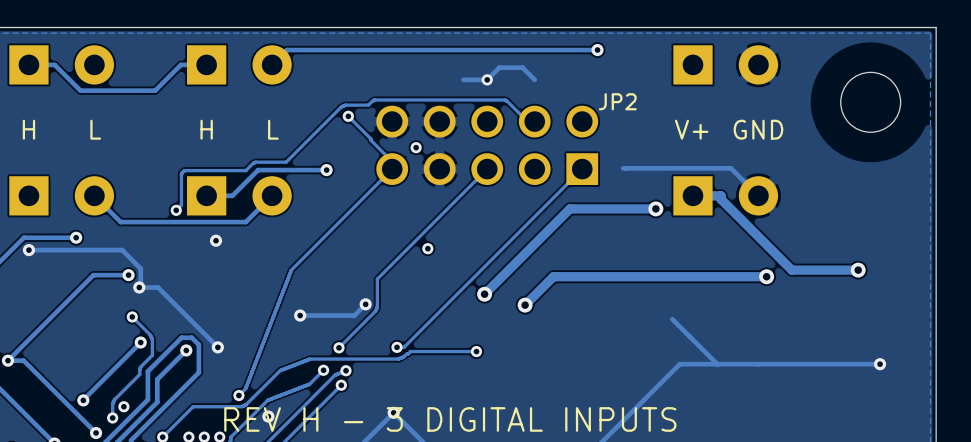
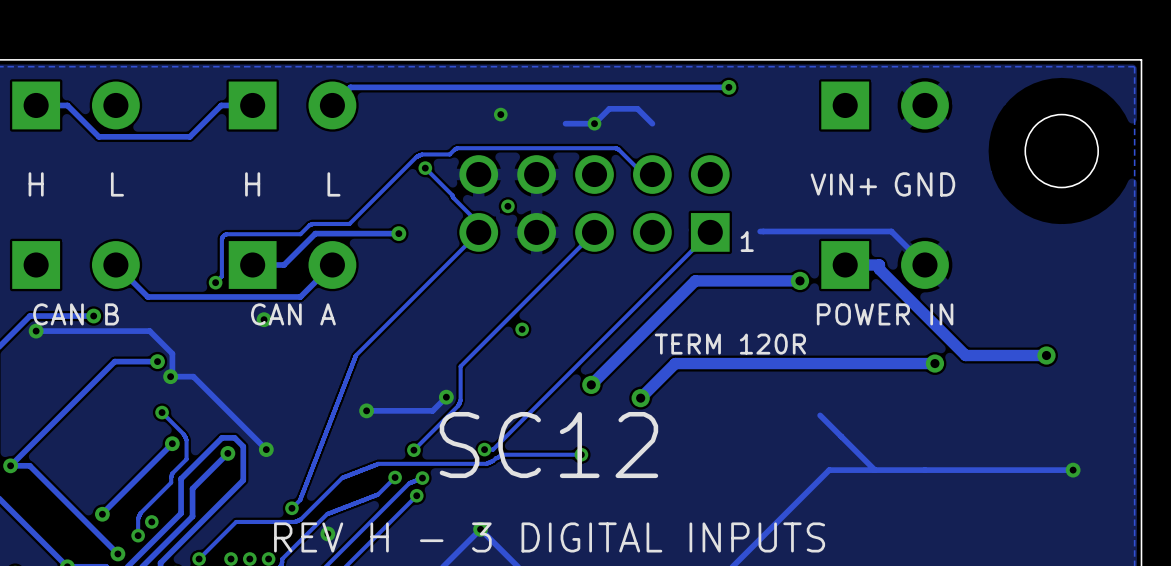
via: none -> (500, 114)
text: JP2 (617, 101) -> none
text: V+ (691, 129) -> VIN+ (843, 184)
text: none -> 1 (747, 241)
text: none -> CAN B (76, 314)
text: none -> CAN A (293, 314)
text: none -> POWER IN (885, 314)
text: none -> TERM 120R (730, 344)
text: none -> SC12 (548, 445)

